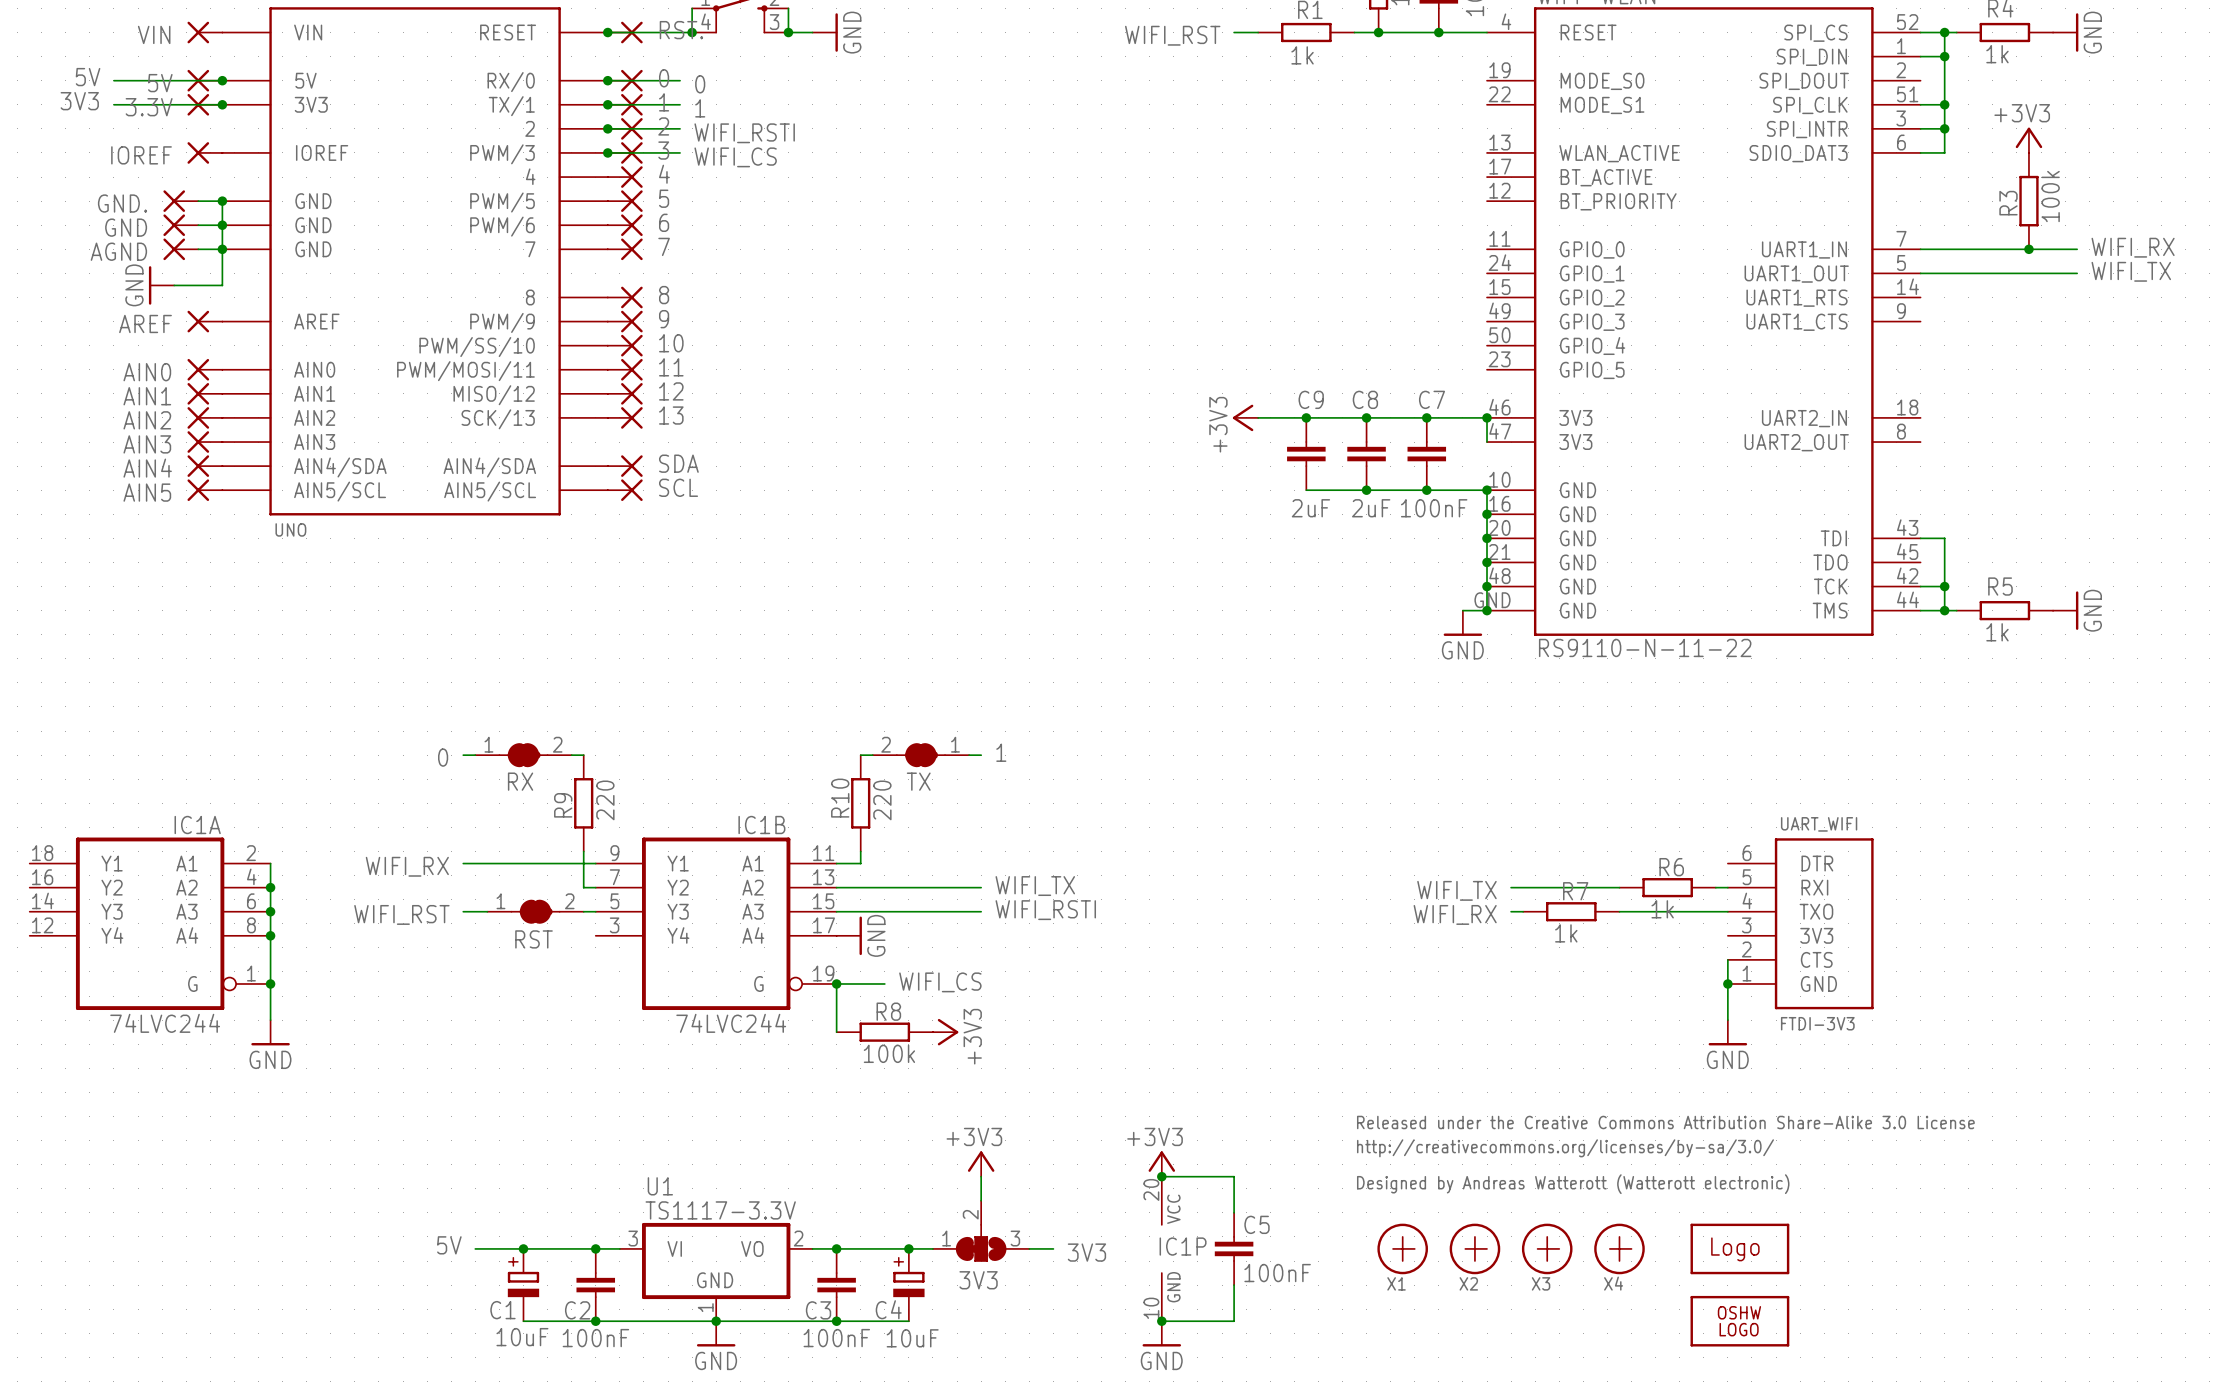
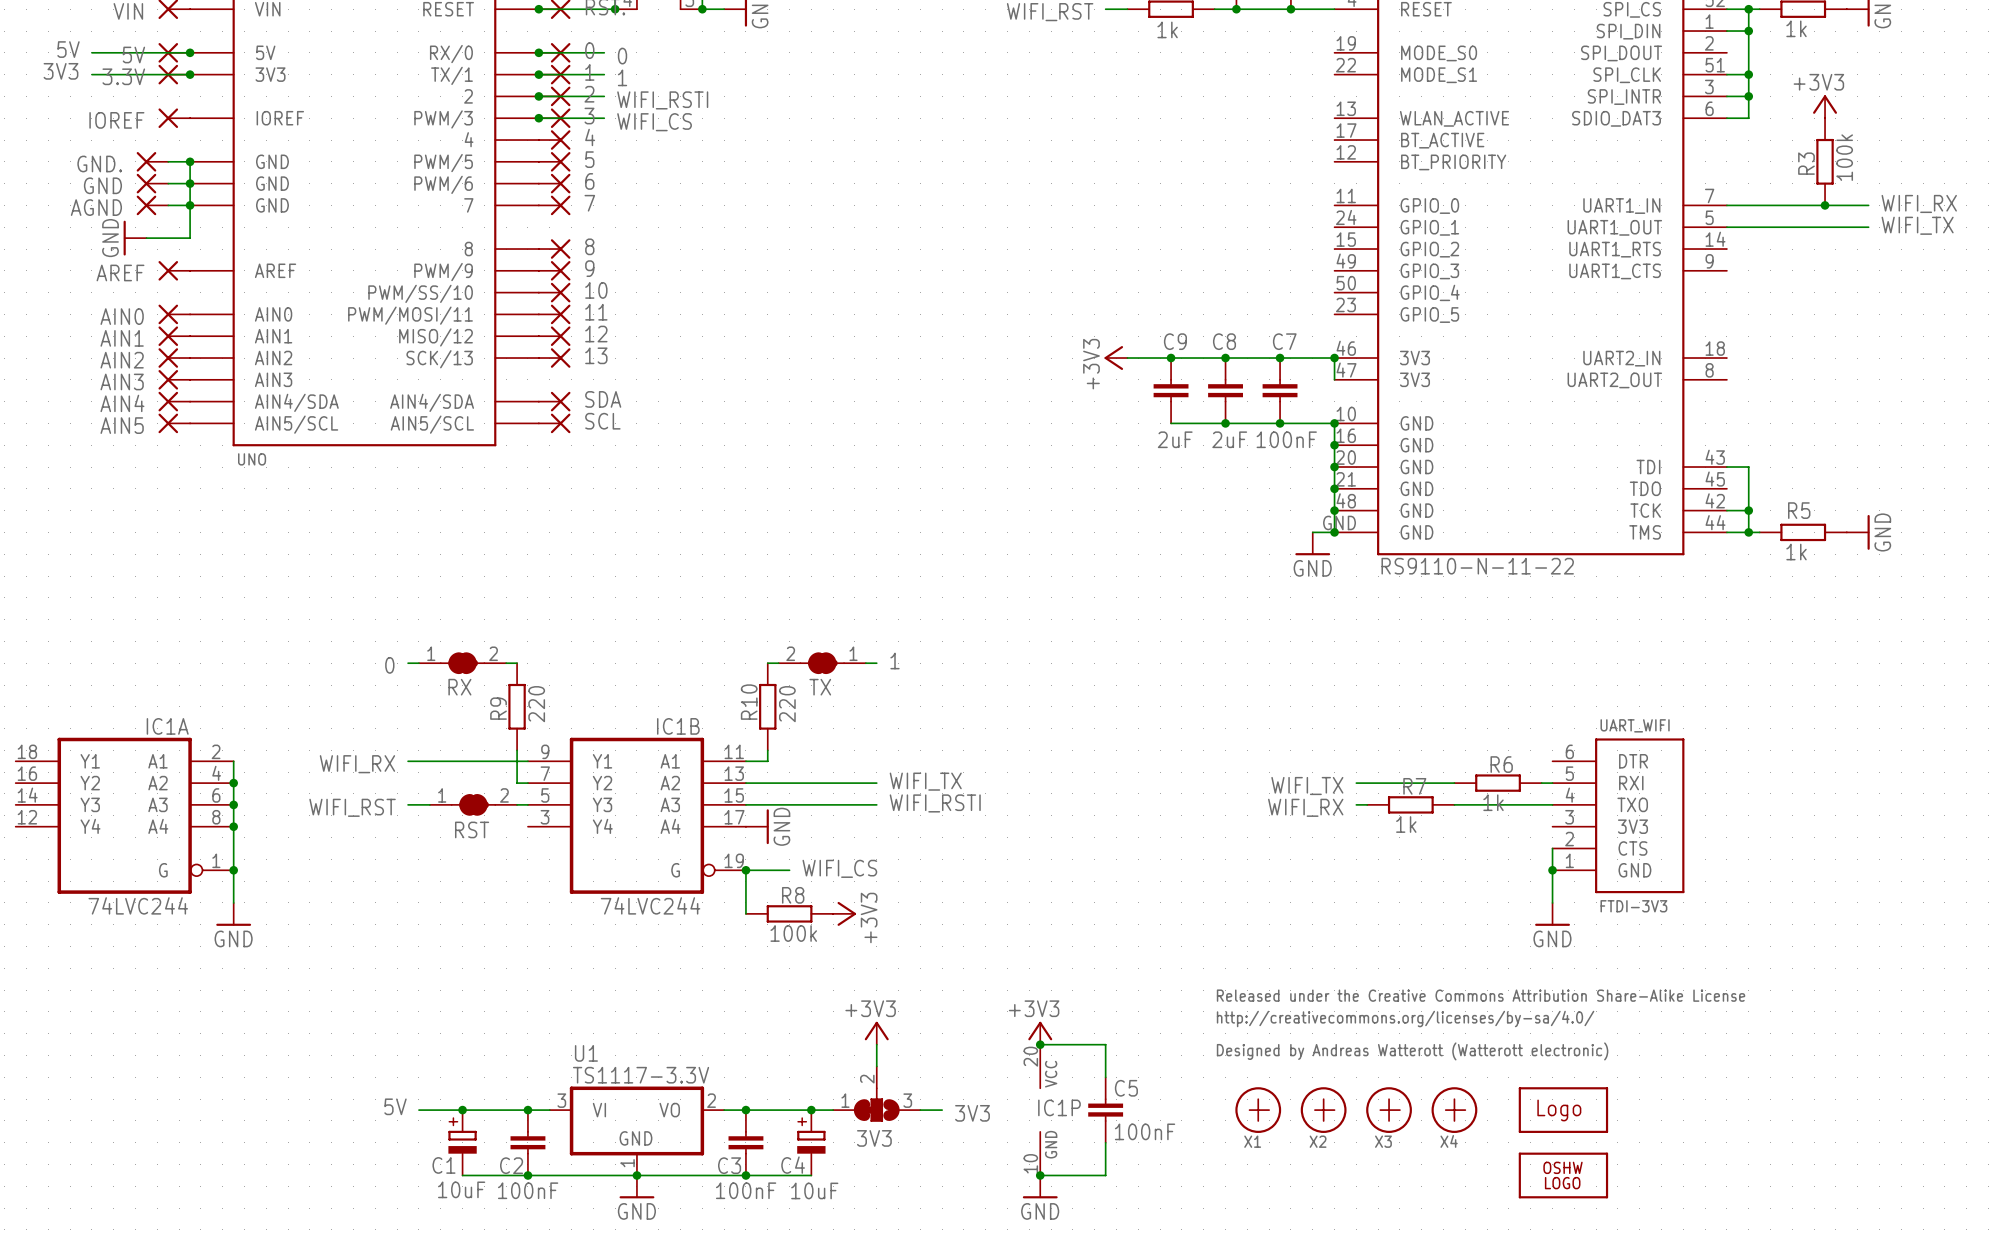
text: Released under the Creative Commons Attribution Share-Alike 3.0 License (1665, 1122) -> Released under the Creative Commons Attribution Share-Alike License (1481, 995)
text: http://creativecommons.org/licenses/by-sa/3.0/ (1565, 1148) -> http://creativecommons.org/licenses/by-sa/4.0/ (1405, 1018)

